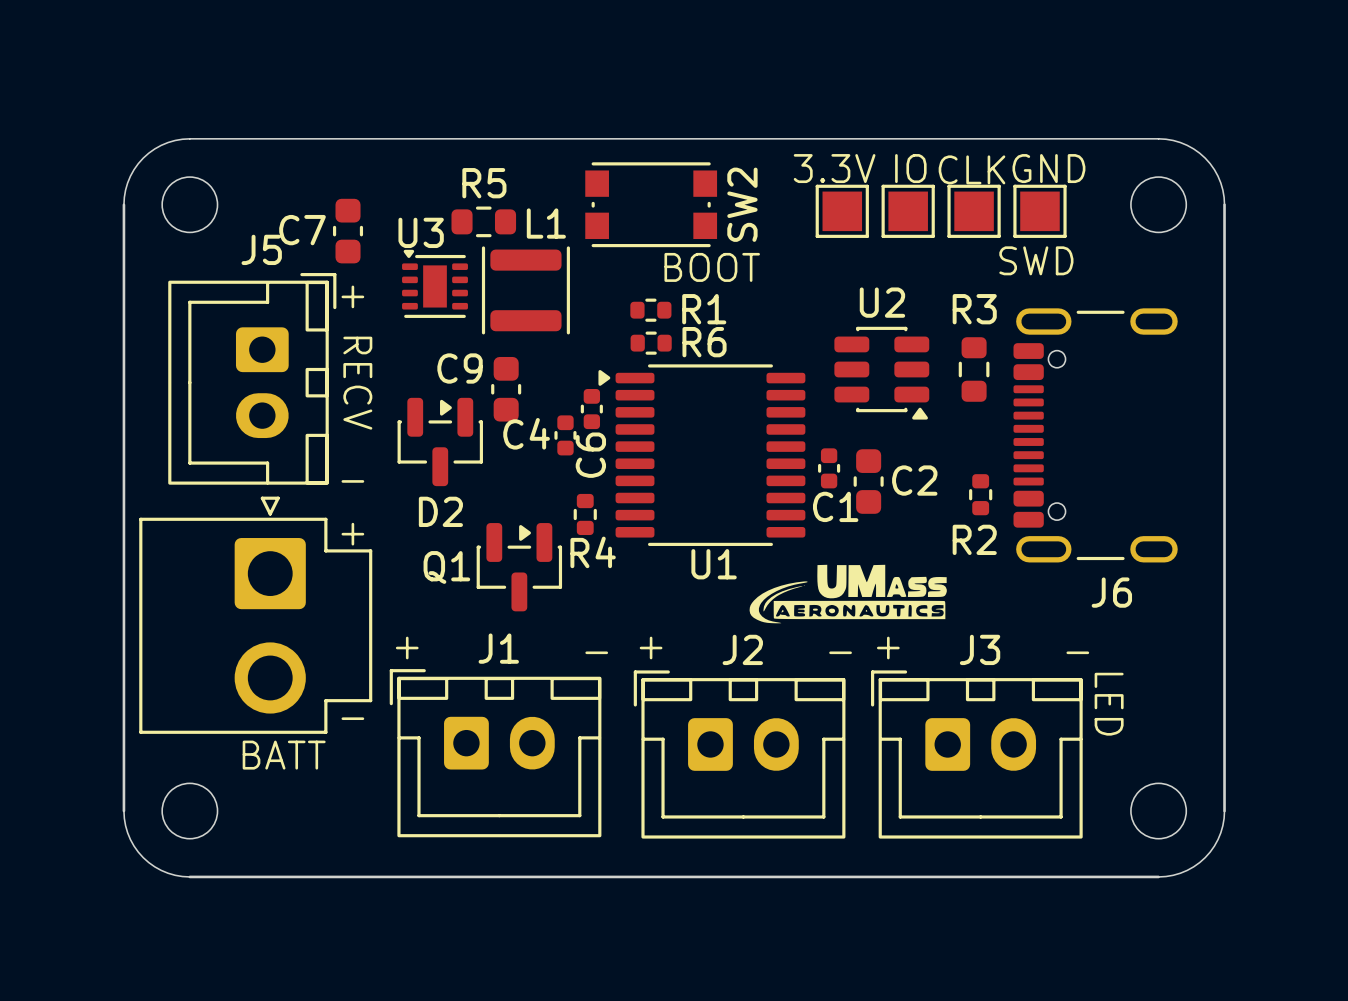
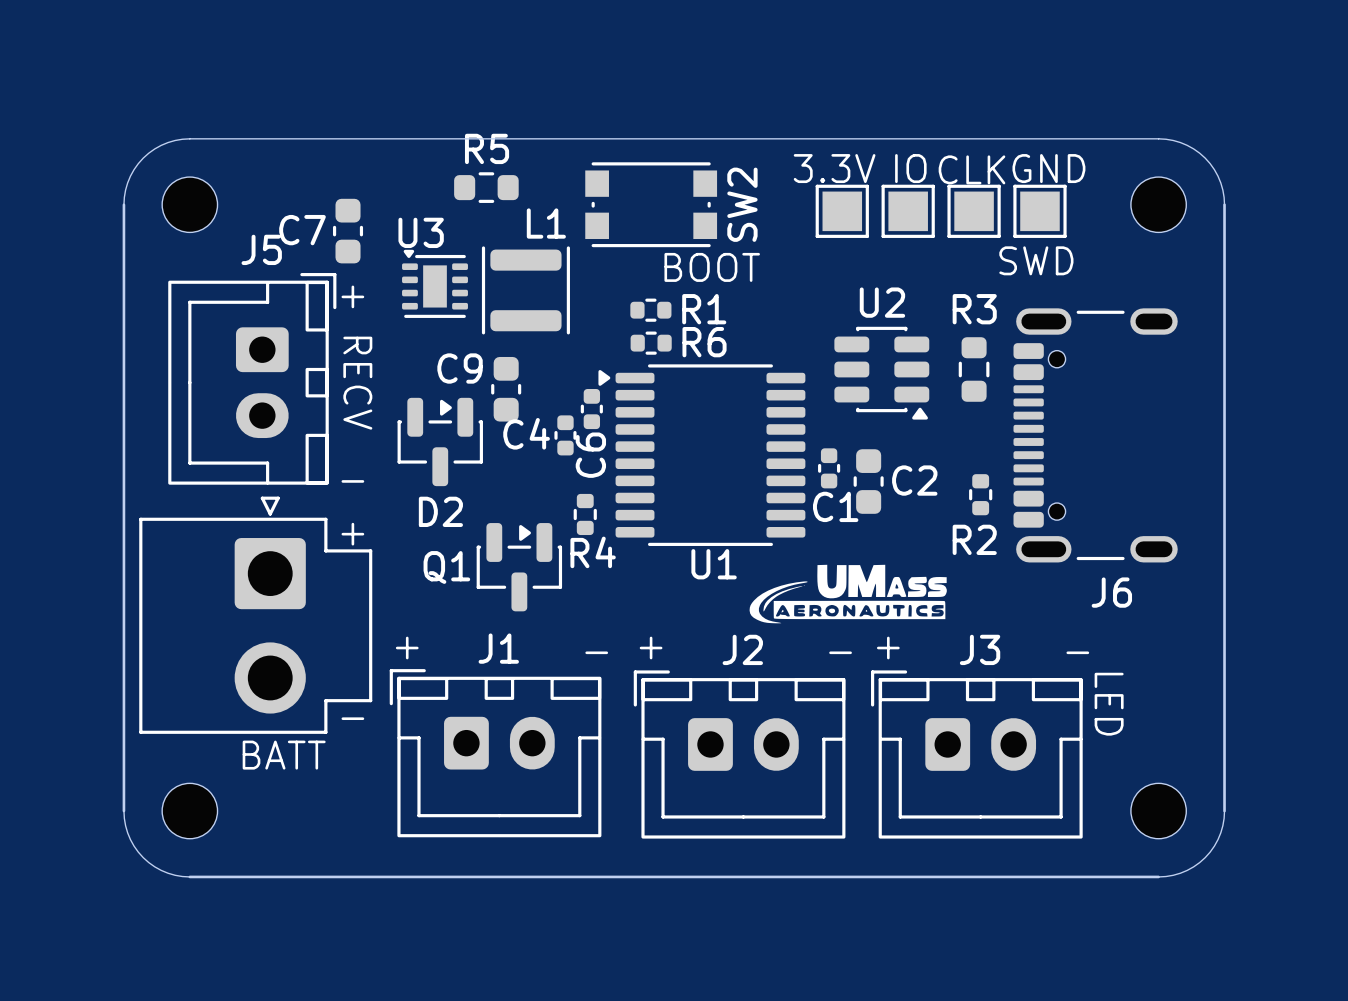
R5 position: (483, 221) -> (486, 187)

